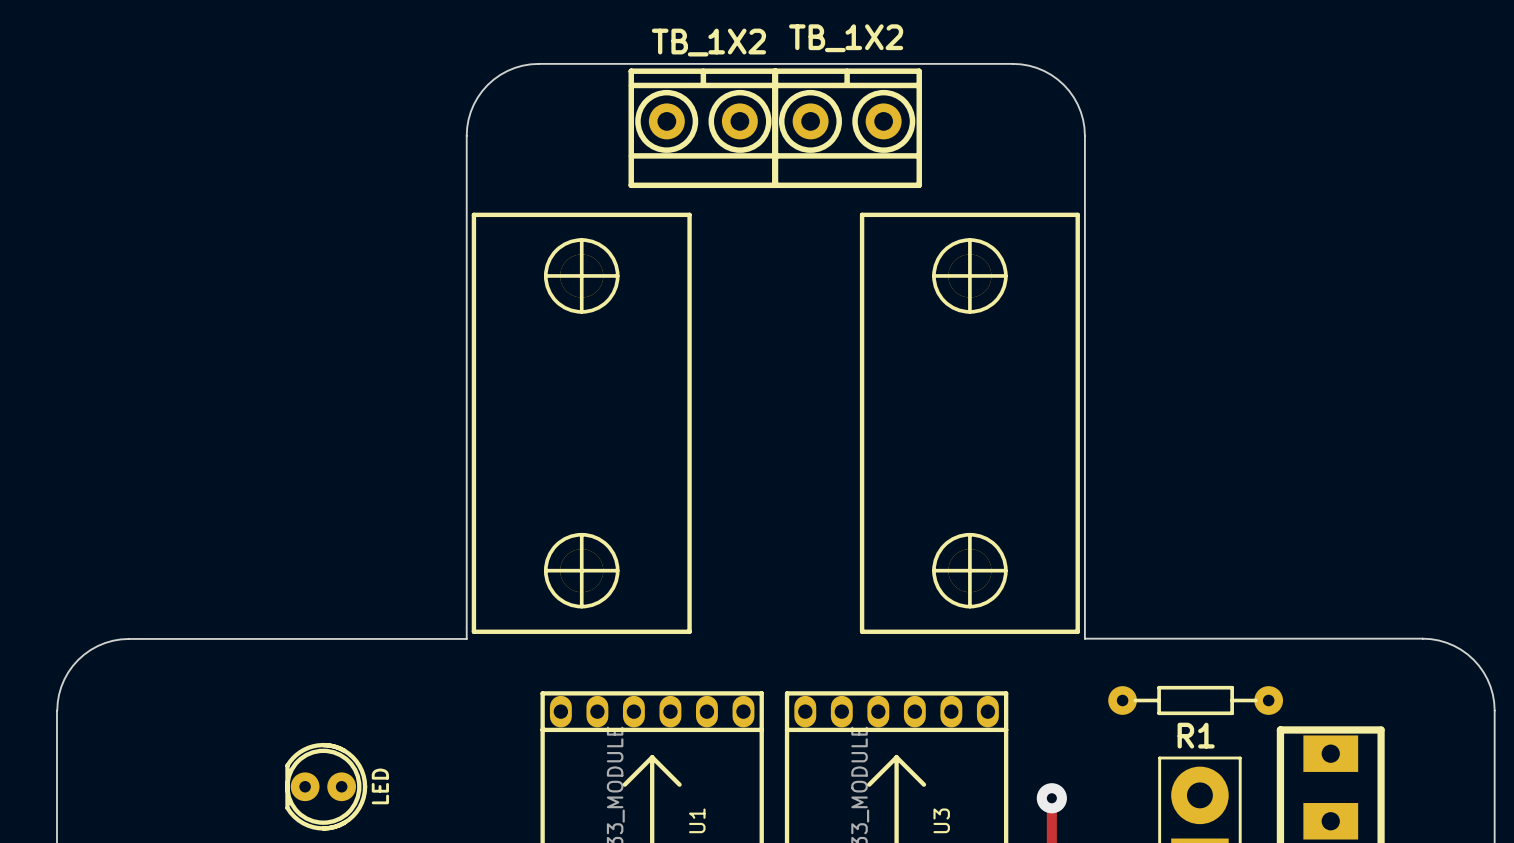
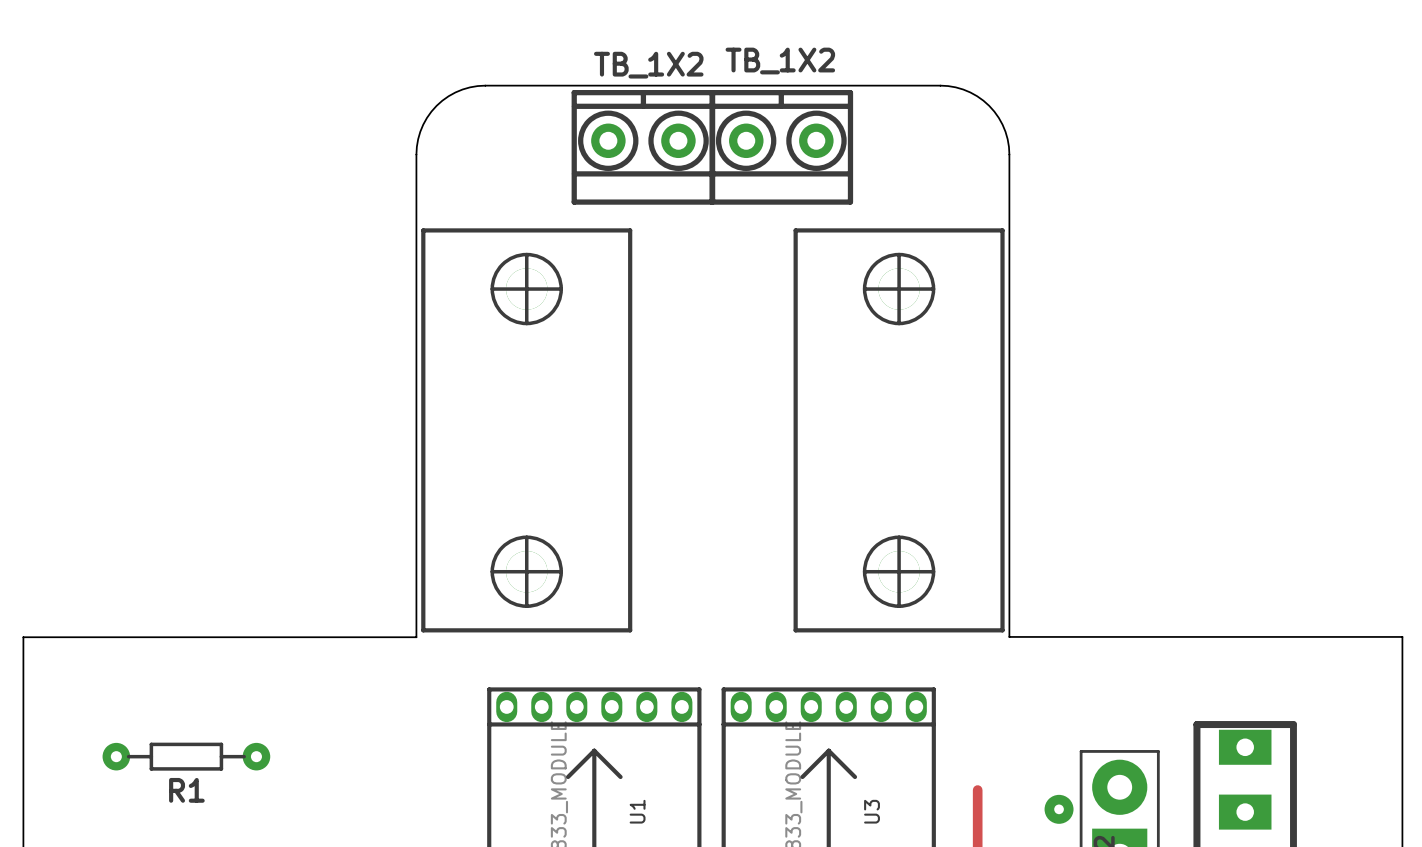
board edge: (128, 638) (112, 640) (97, 646) (78, 659) (64, 679) (59, 694) (57, 710) -> (92, 637) (23, 637) (23, 705)
board edge: (1422, 638) (1438, 640) (1453, 645) (1473, 659) (1483, 672) (1490, 686) (1494, 710) -> (1333, 636) (1402, 636) (1402, 705)
R1 position: (1195, 700) -> (186, 756)
part: LED (326, 786) -> none
via: (1051, 798) -> none
via: none -> (1059, 809)

